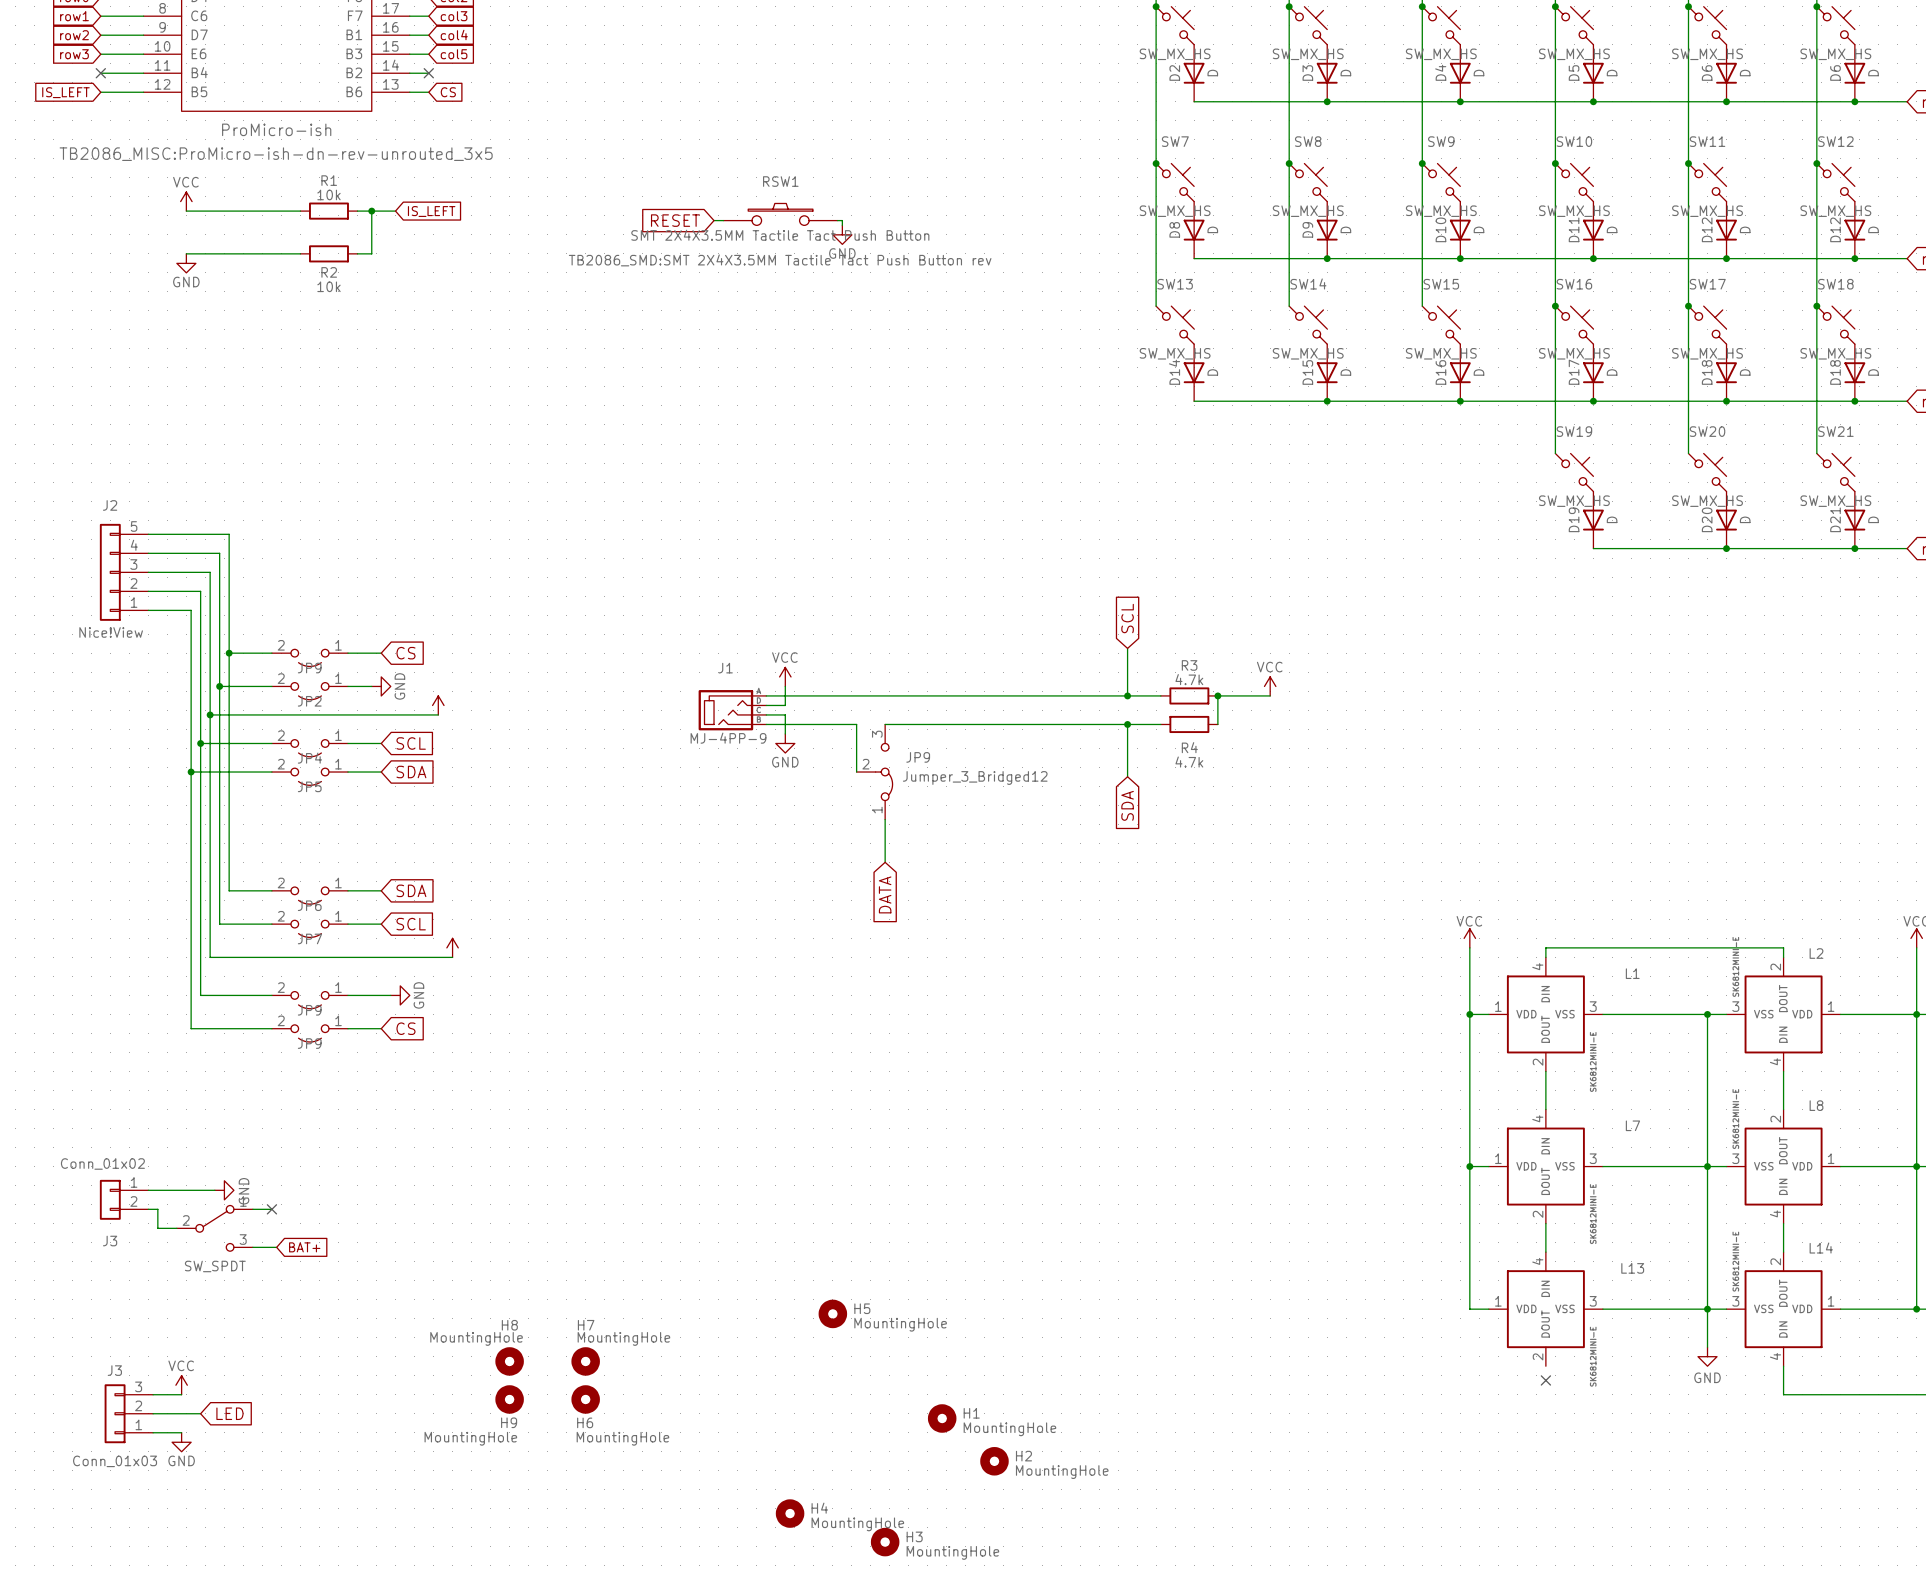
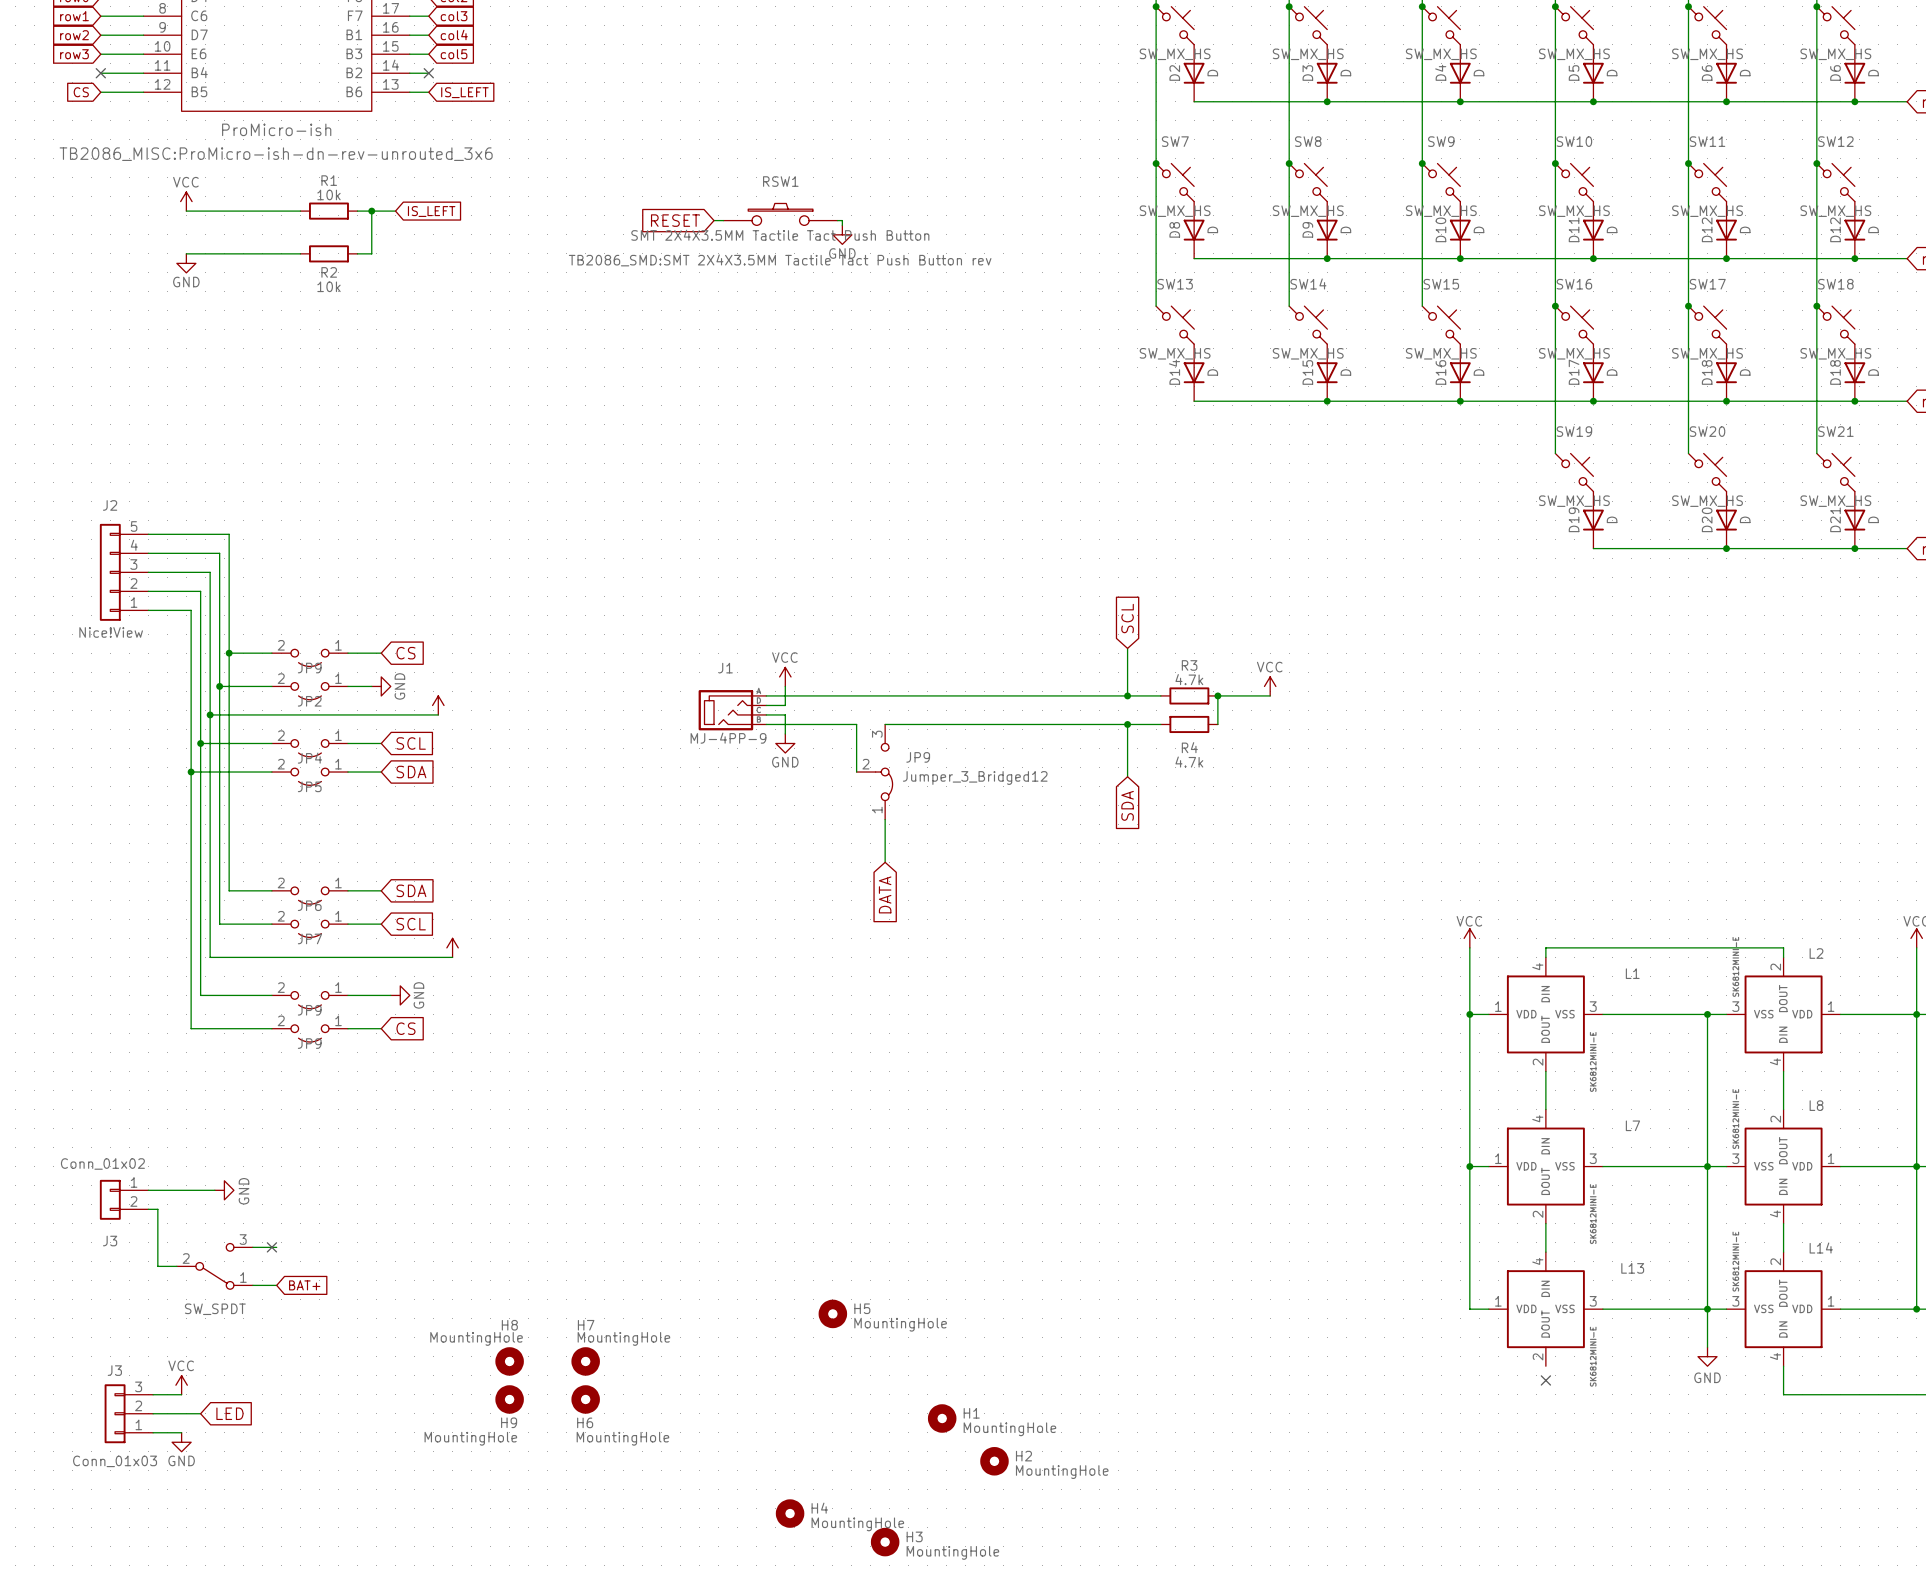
global label: IS_LEFT (65, 92) -> CS (81, 92)
global label: CS (448, 92) -> IS_LEFT (464, 92)
part text: TB2086_MISC:ProMicro-ish-dn-rev-unrouted_3x5 (276, 154) -> TB2086_MISC:ProMicro-ish-dn-rev-unrouted_3x6 (276, 154)
wire: (252, 1209) (271, 1209) -> none
no-connect mark position: (271, 1209) -> (271, 1247)
wire: (157, 1228) (176, 1228) -> (157, 1228) (157, 1266) (176, 1266)
part: SW_SPDT (214, 1228) -> none
global label position: BAT+ (304, 1247) -> BAT+ (304, 1285)
part: none -> SW_SPDT (214, 1266)
wire: none -> (252, 1285) (276, 1285)

